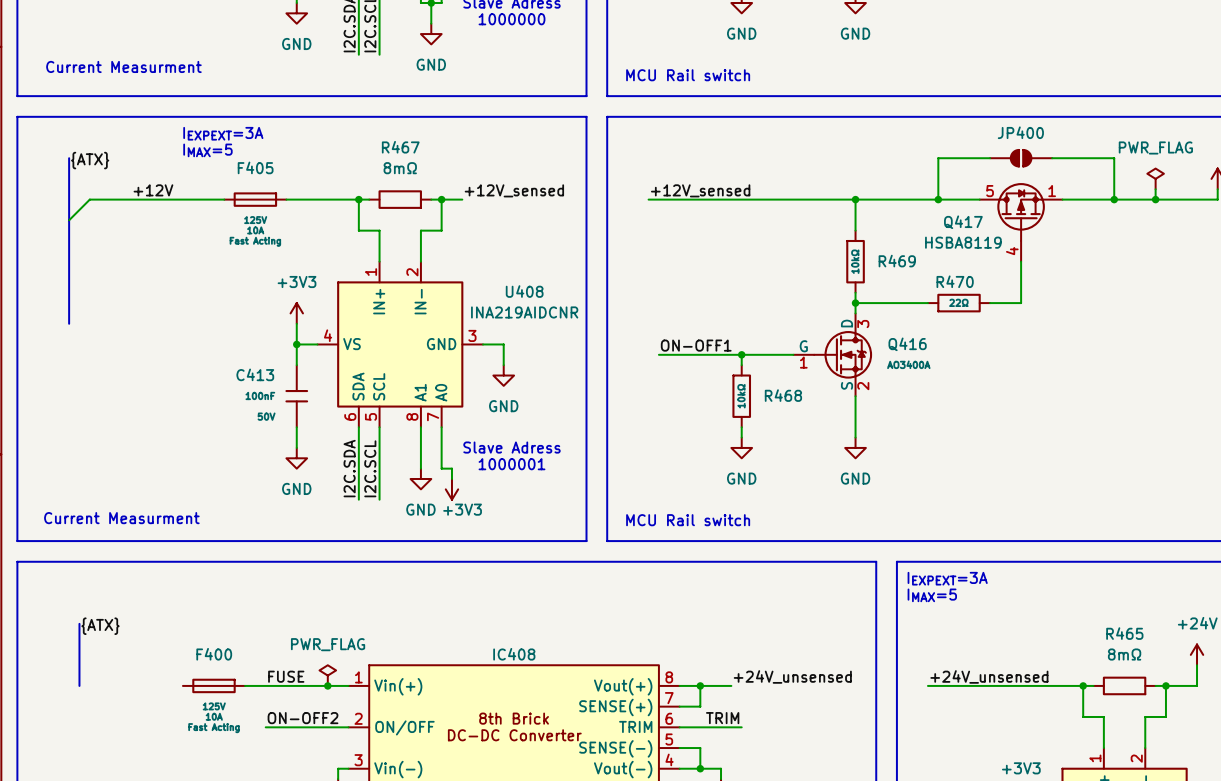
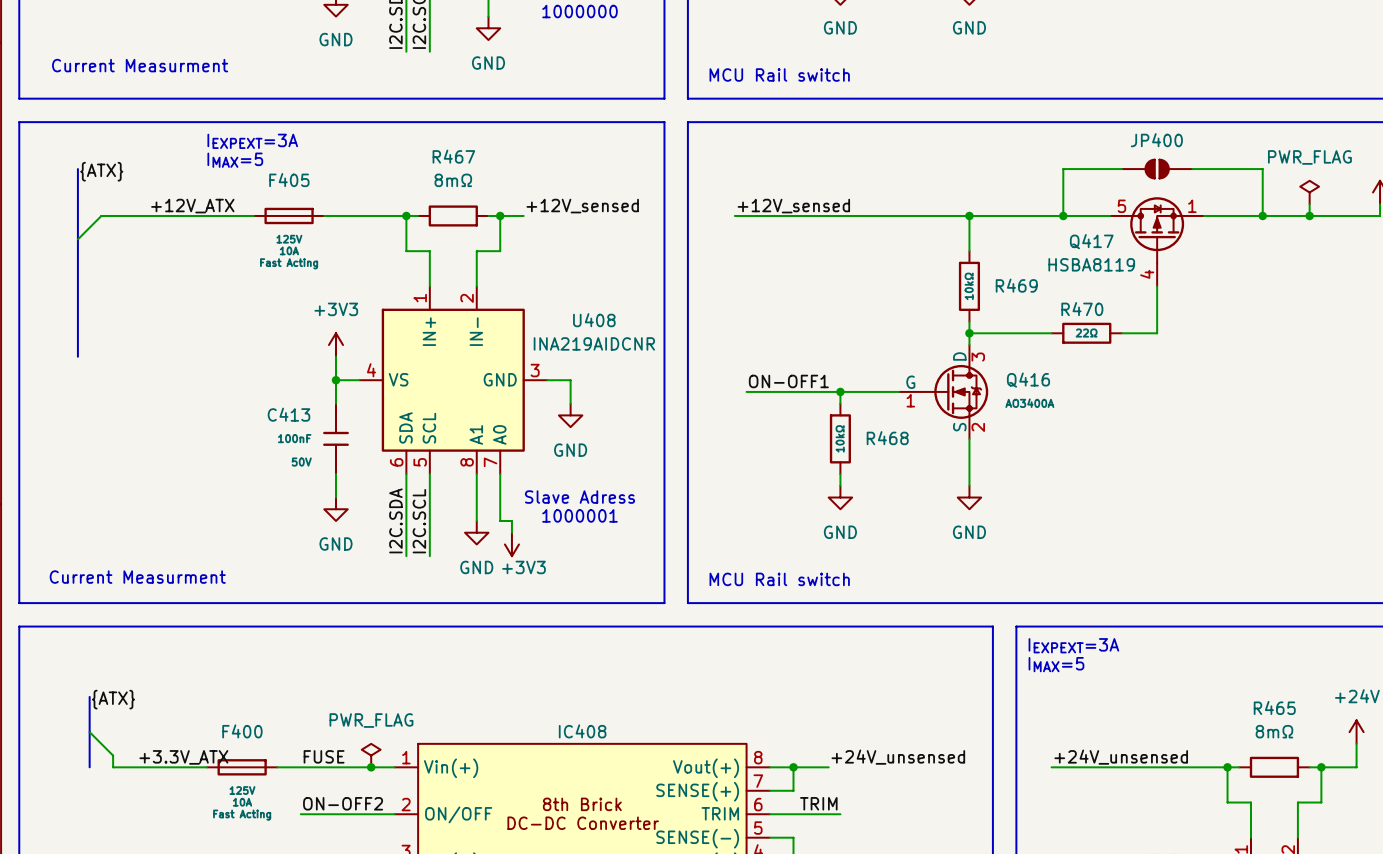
label: +12V (153, 190) -> +12V_ATX (192, 206)
wire: none -> (89, 732) (113, 755) (113, 767) (206, 767)
label: none -> +3.3V_ATX (183, 757)

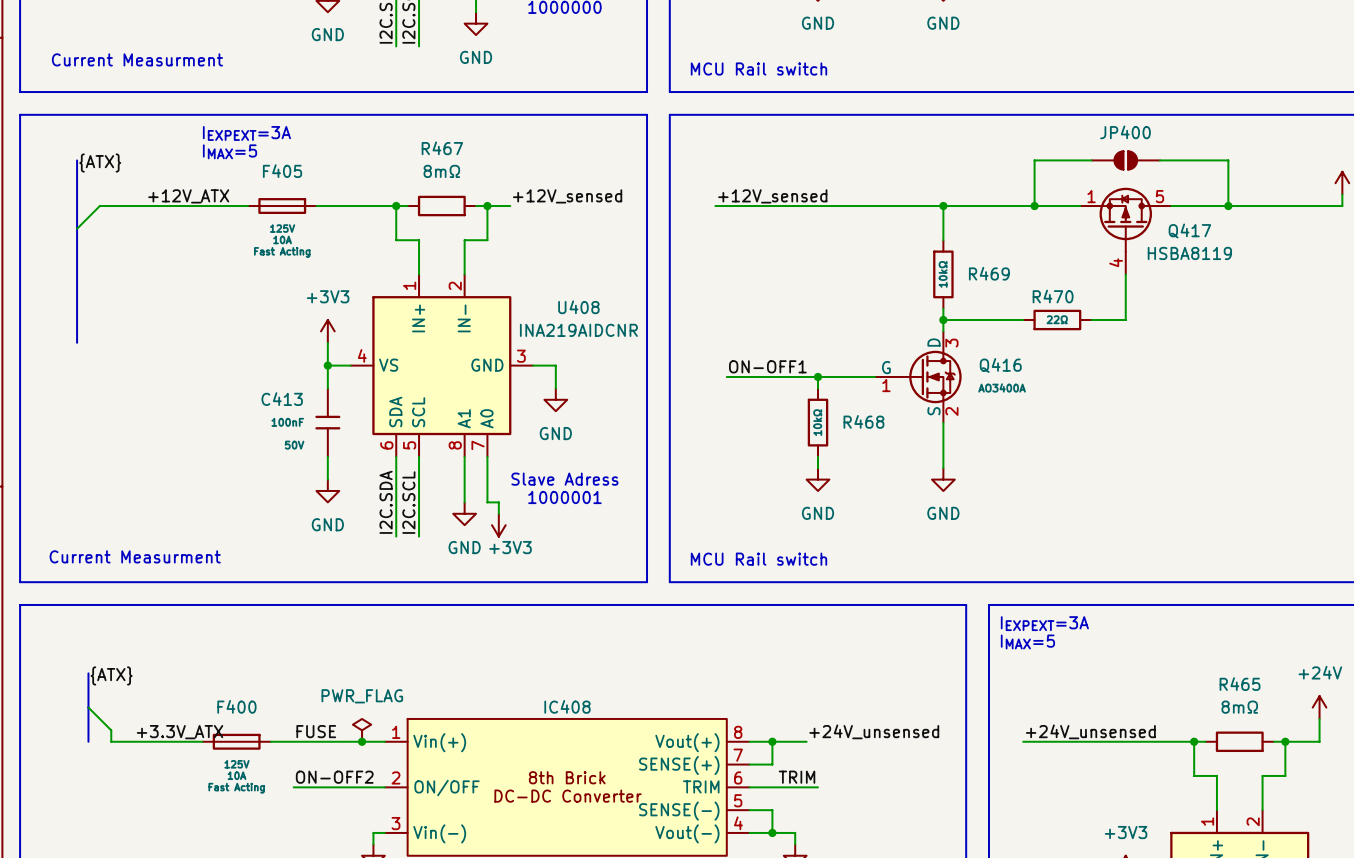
power symbol: PWR_FLAG (1309, 192) -> none
wire: (1309, 204) (1309, 215) -> none
junction: (1309, 215) -> none
Q417 flip: as is (1157, 230) -> left-right (1125, 219)

